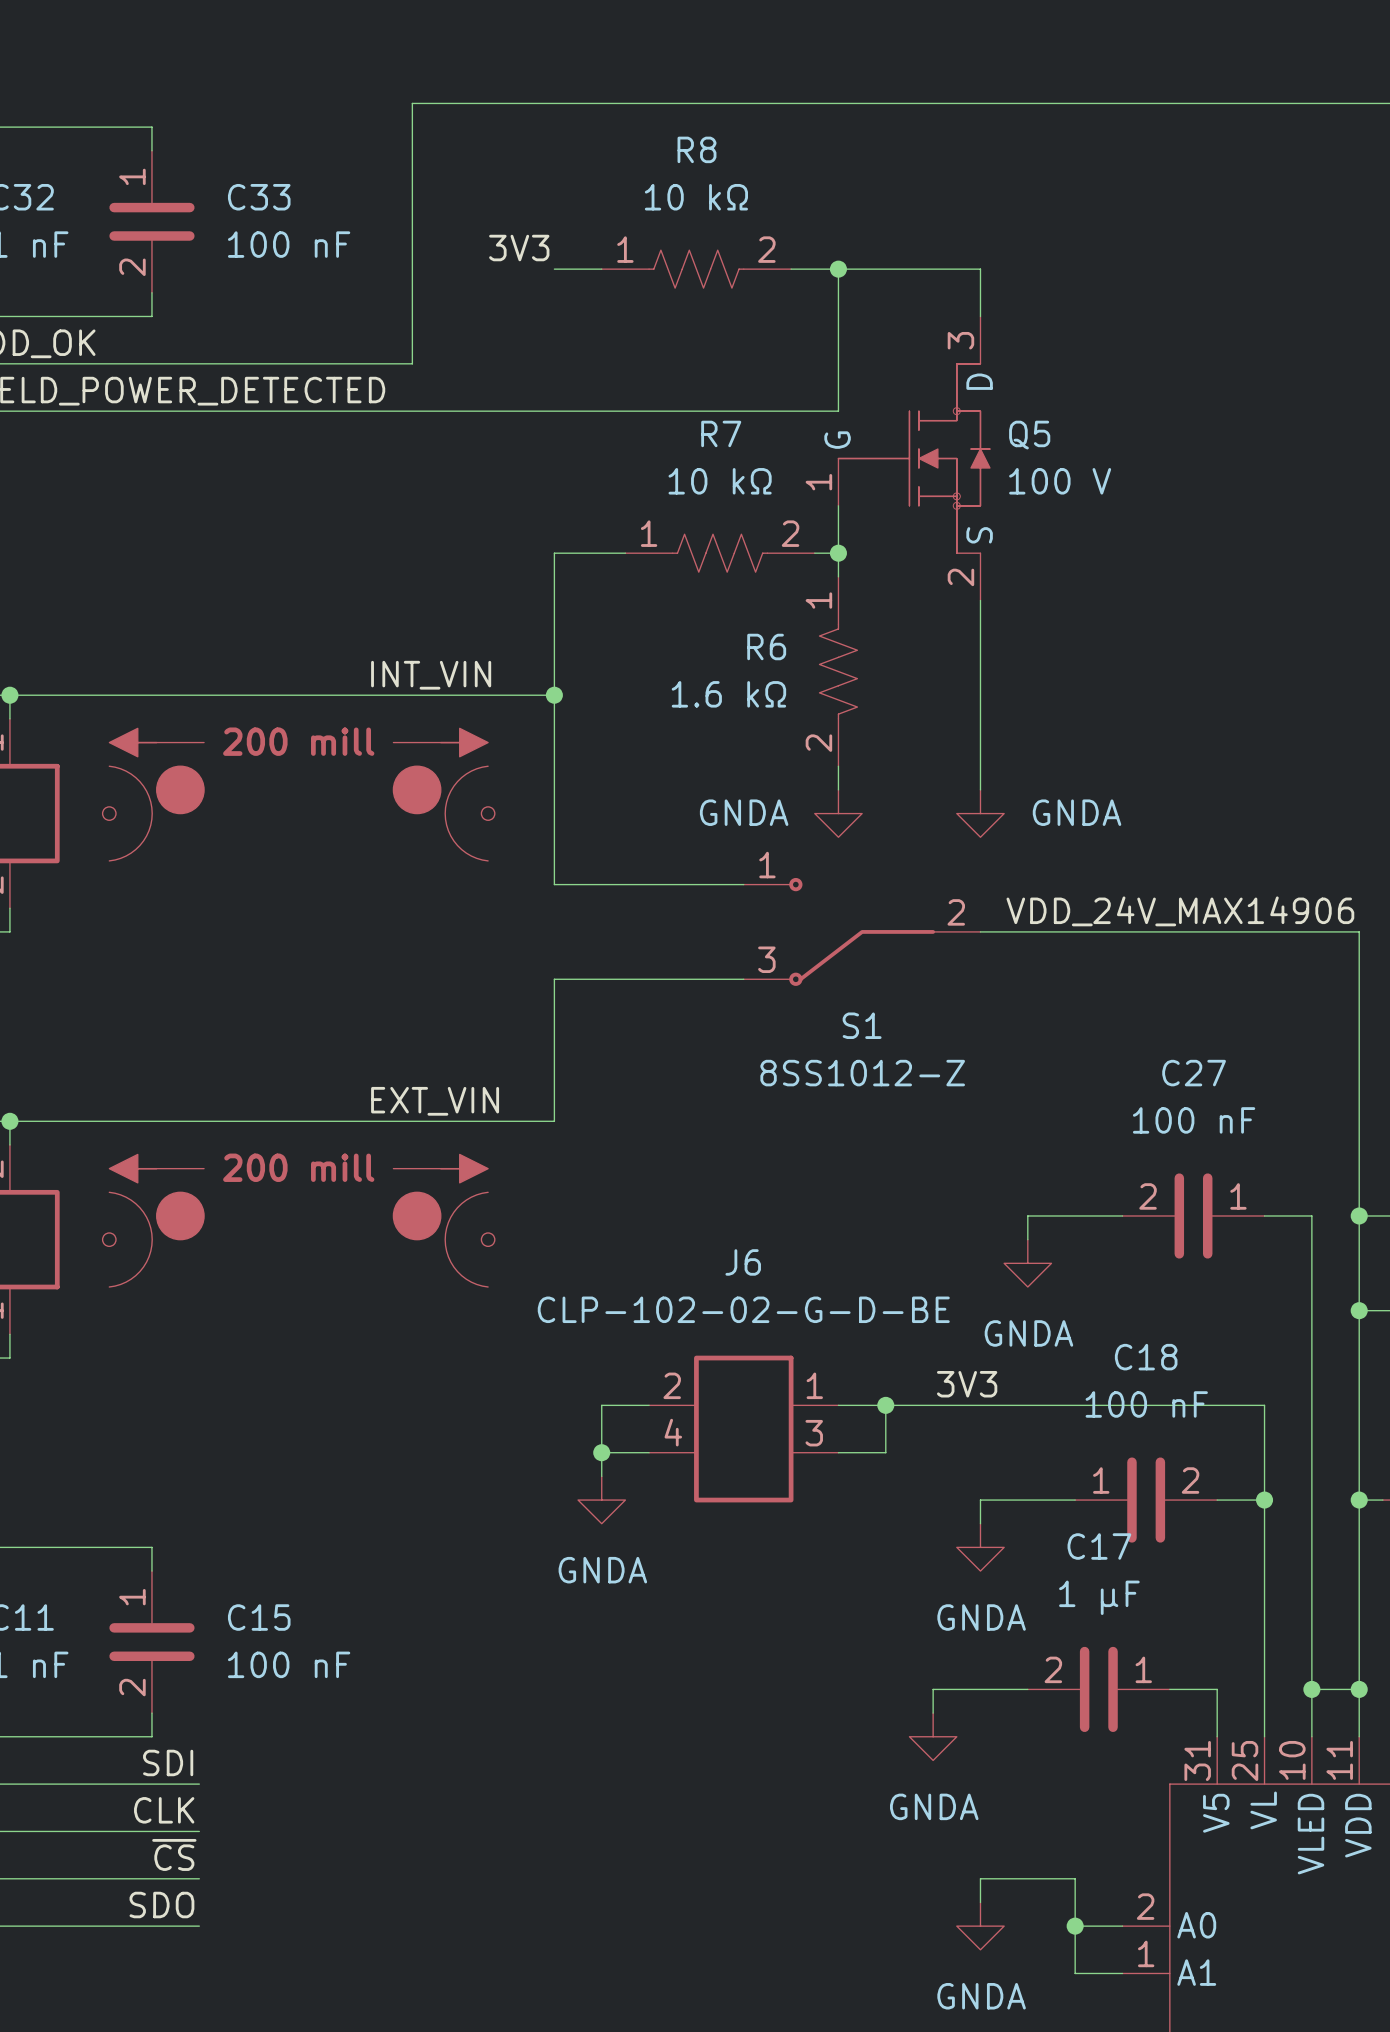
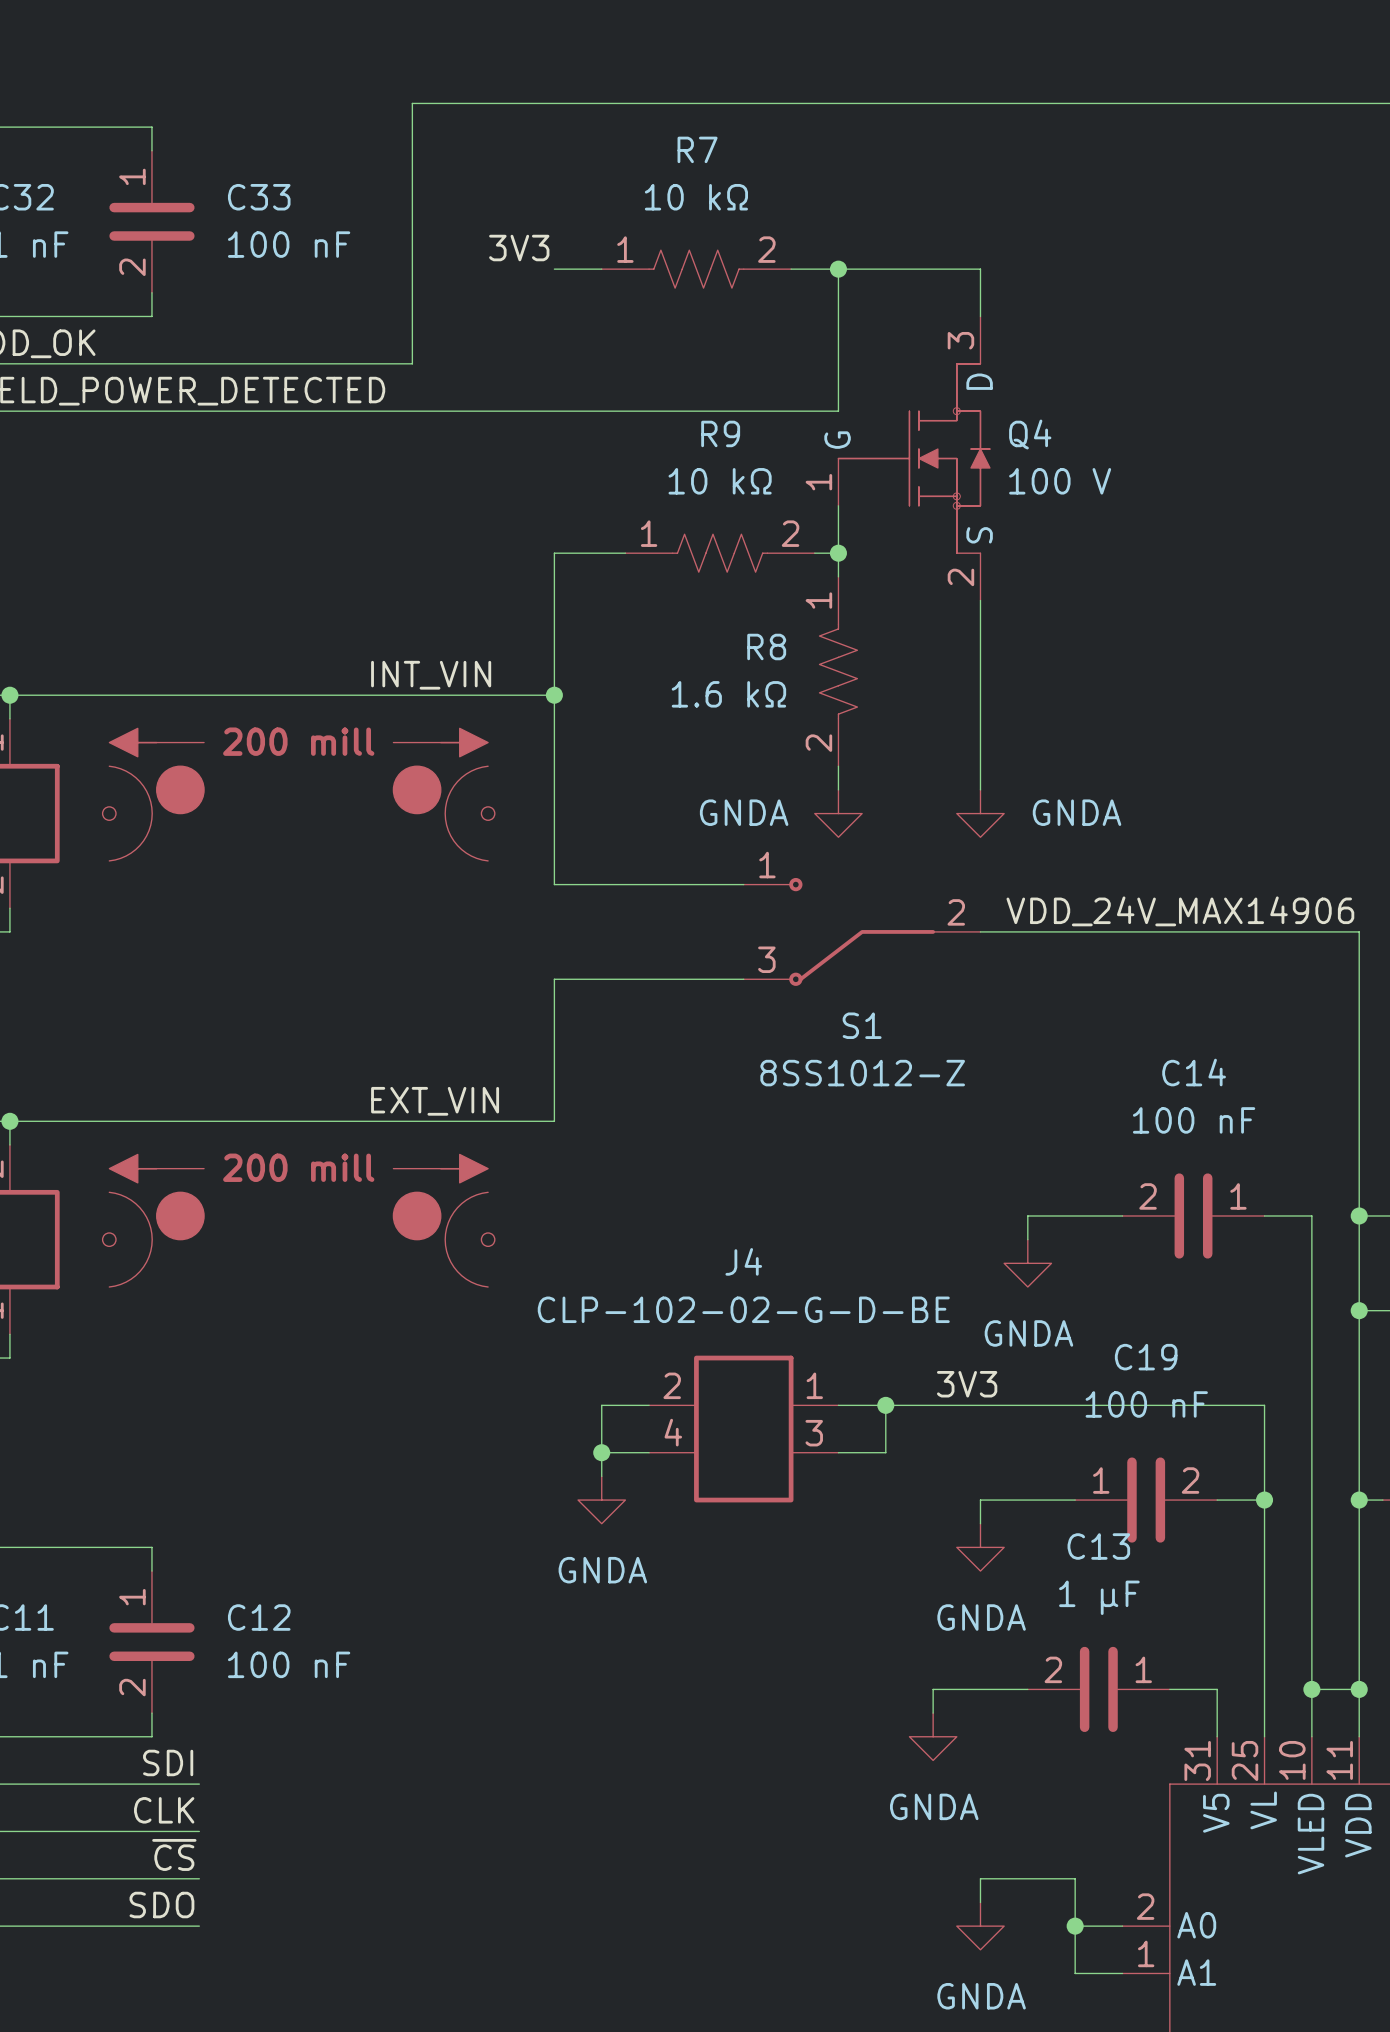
R8 name: R8 (696, 149) -> R7 (697, 149)
R7 name: R7 (721, 433) -> R9 (720, 433)
Q5 name: Q5 (1029, 435) -> Q4 (1030, 434)
R6 name: R6 (766, 646) -> R8 (766, 646)
C27 name: C27 (1194, 1073) -> C14 (1194, 1072)
J6 name: J6 (743, 1262) -> J4 (743, 1261)
C18 name: C18 (1146, 1357) -> C19 (1146, 1357)
C17 name: C17 (1099, 1546) -> C13 (1098, 1546)
C15 name: C15 (259, 1617) -> C12 (259, 1617)

